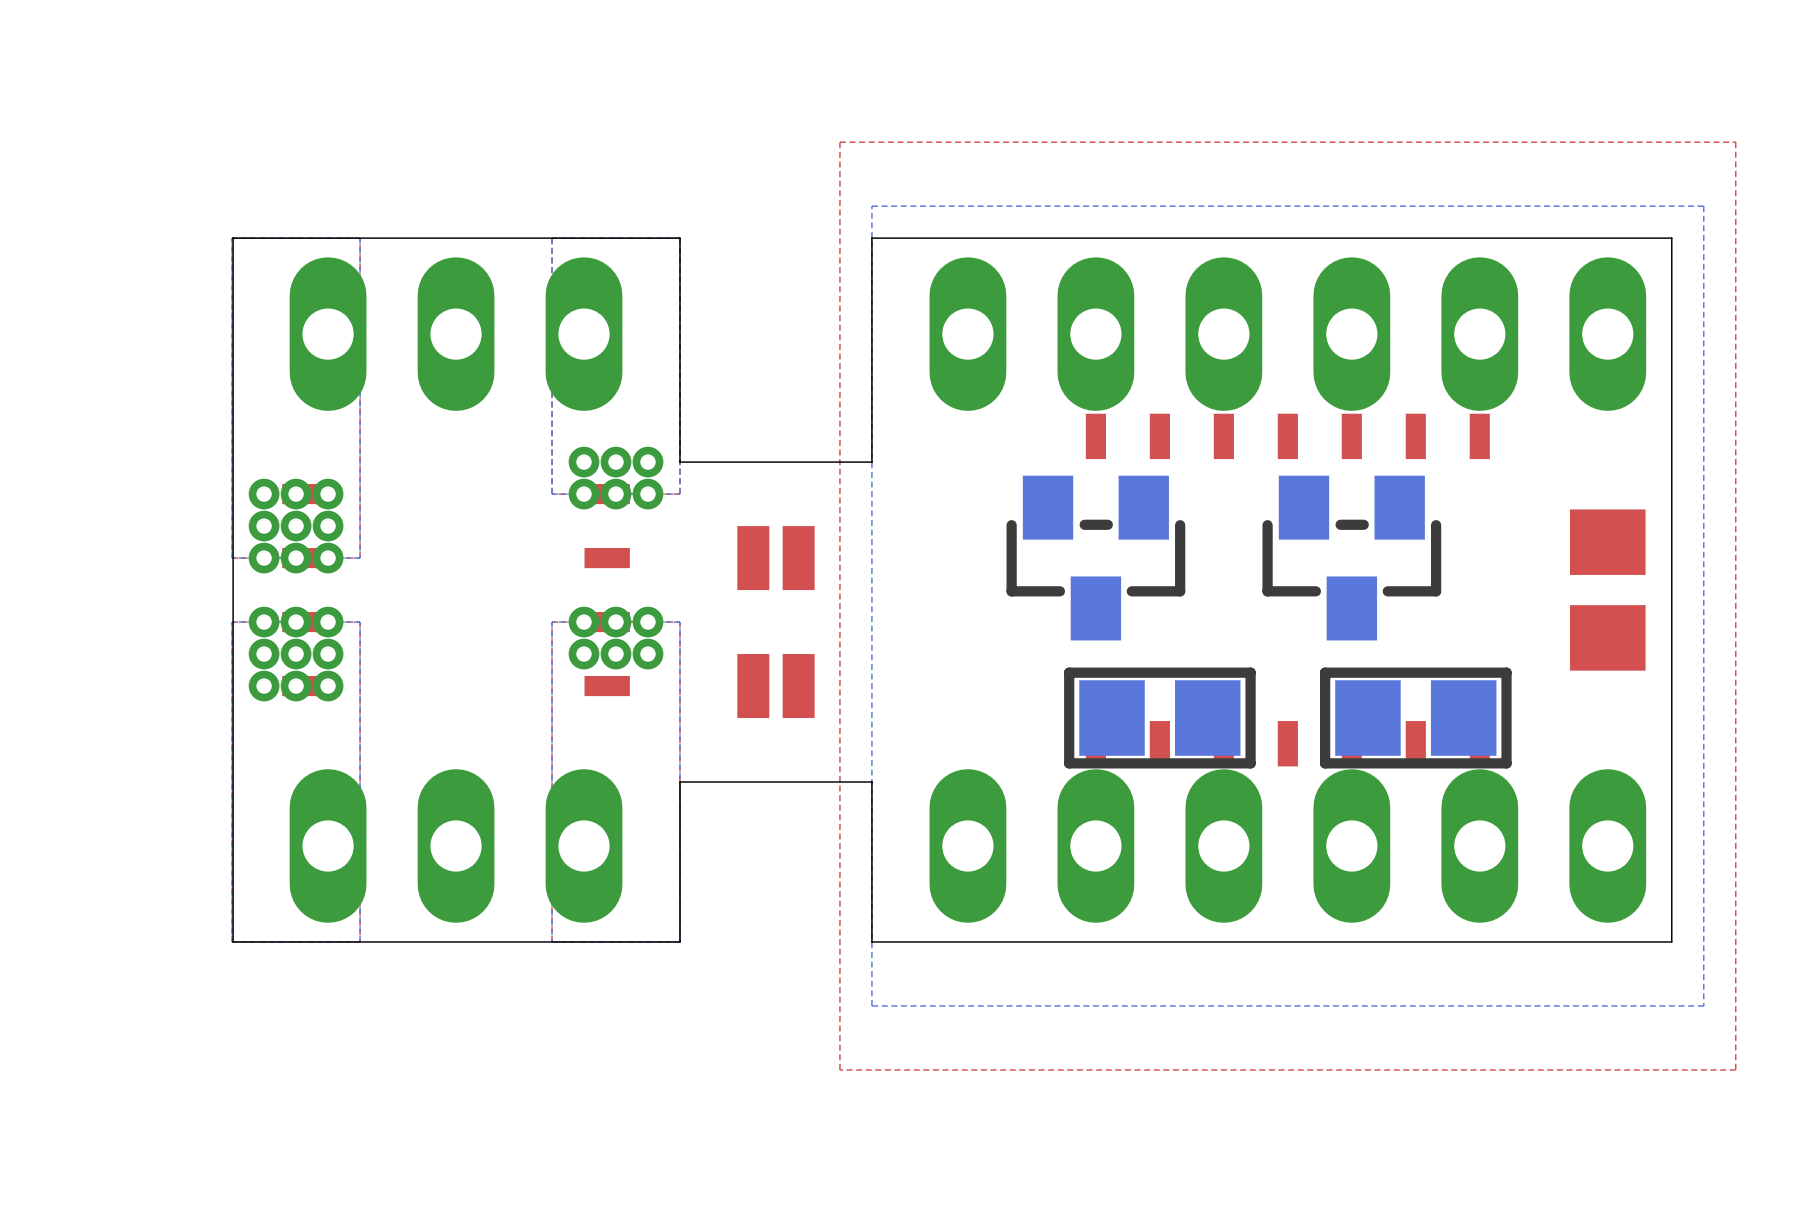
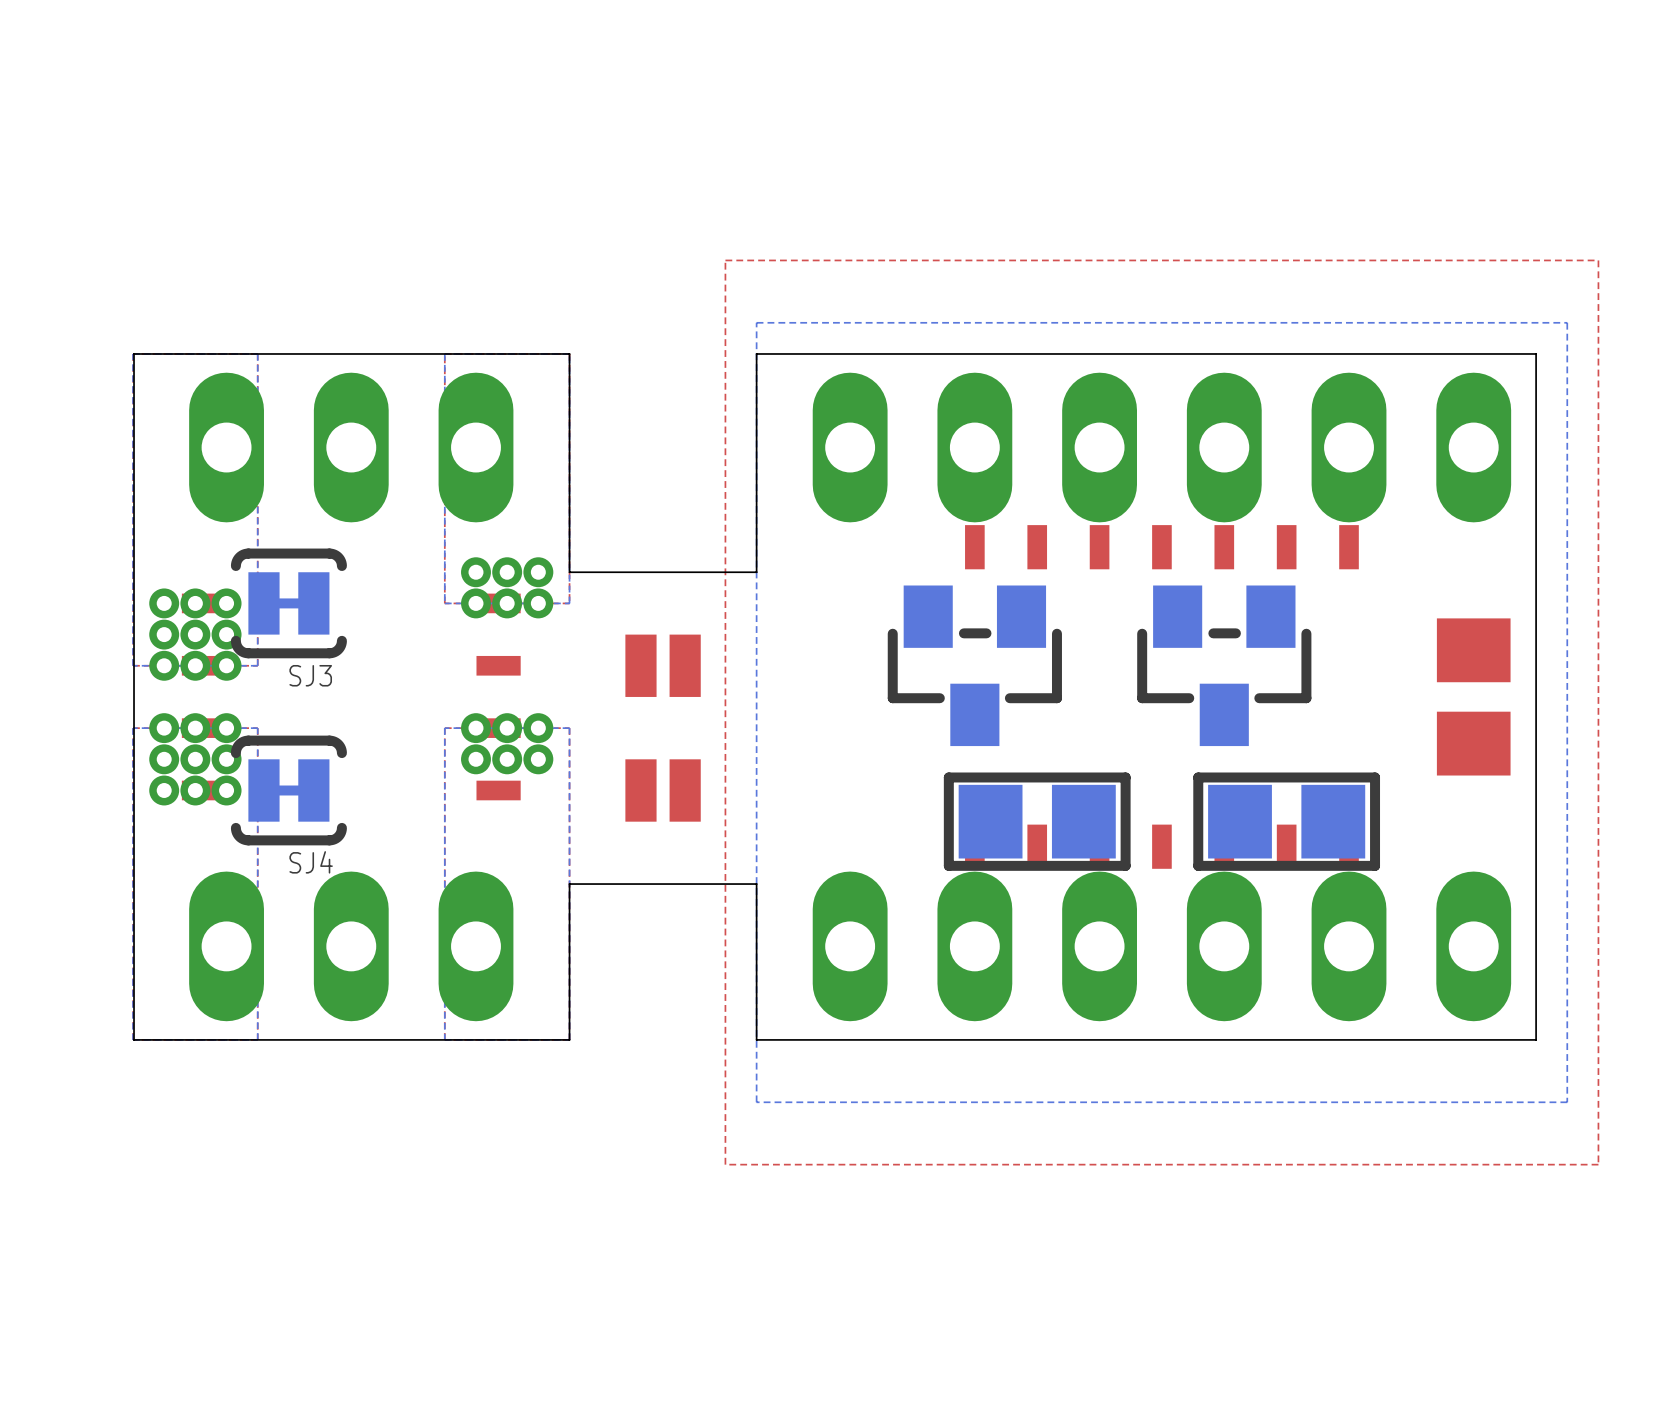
SJ3: none -> (288, 603)
SJ4: none -> (288, 790)

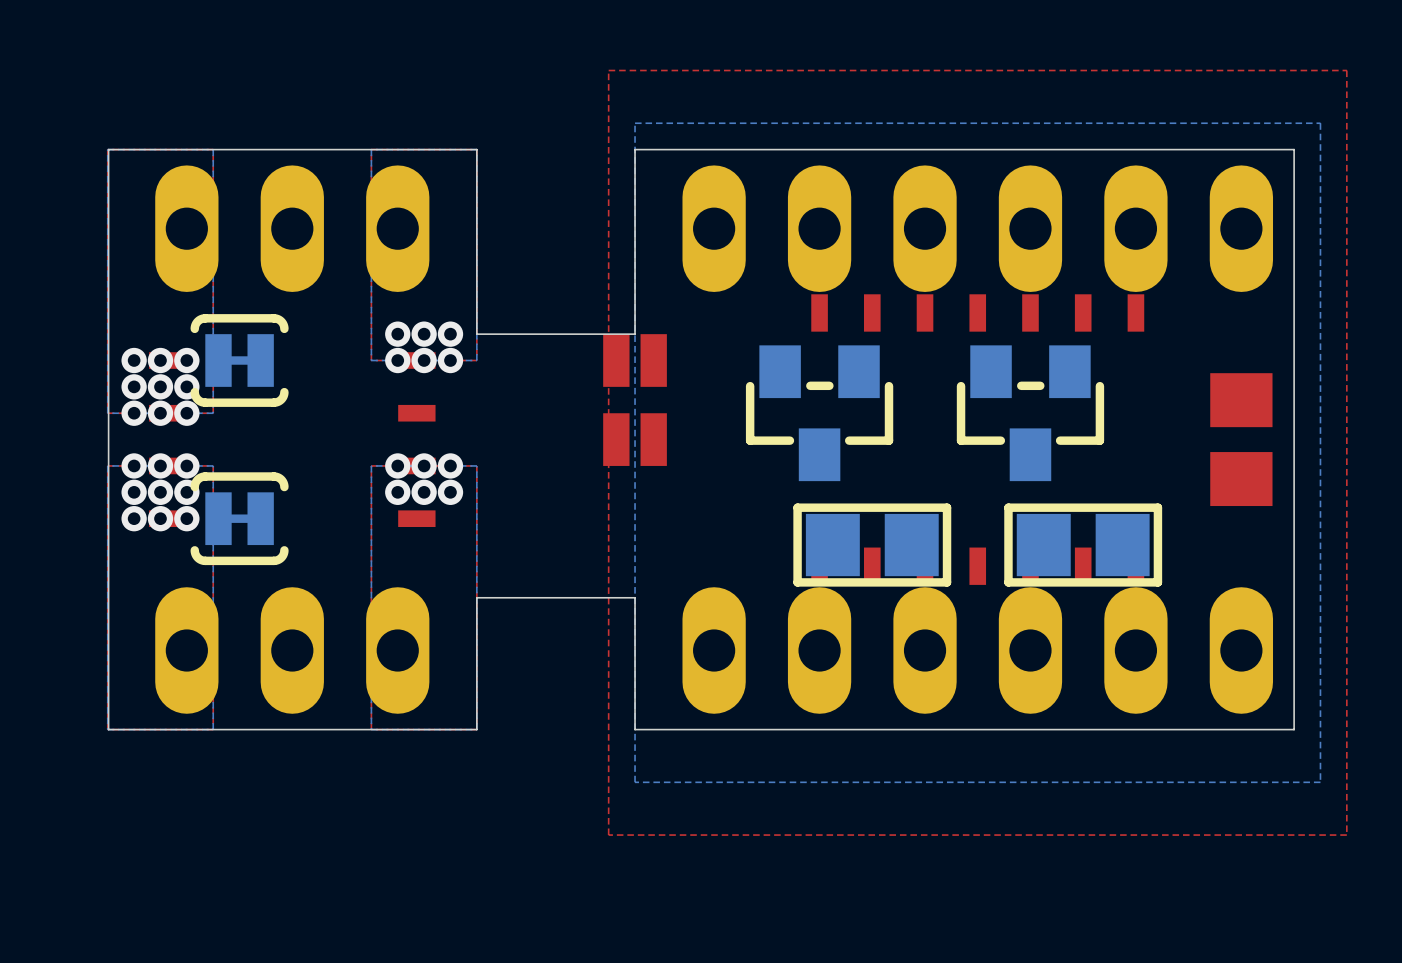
part: none -> (635, 360)
part: (663, 665) -> none
SJ3 name: SJ3 (310, 675) -> none
part: none -> (635, 439)
part: (663, 790) -> none
SJ4 name: SJ4 (311, 862) -> none

